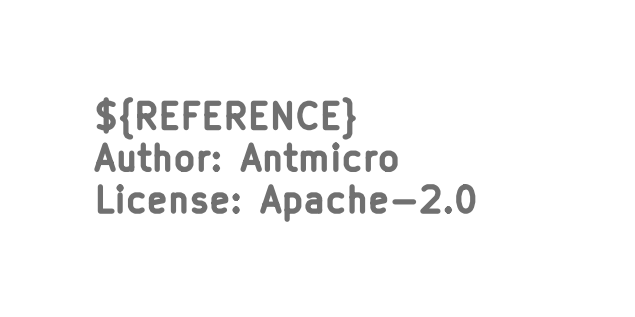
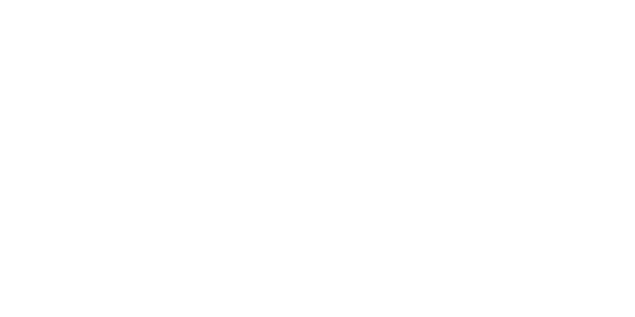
text: ${REFERENCE} (226, 118) -> none
text: Author: Antmicro (245, 157) -> none
text: License: Apache-2.0 (286, 203) -> none

